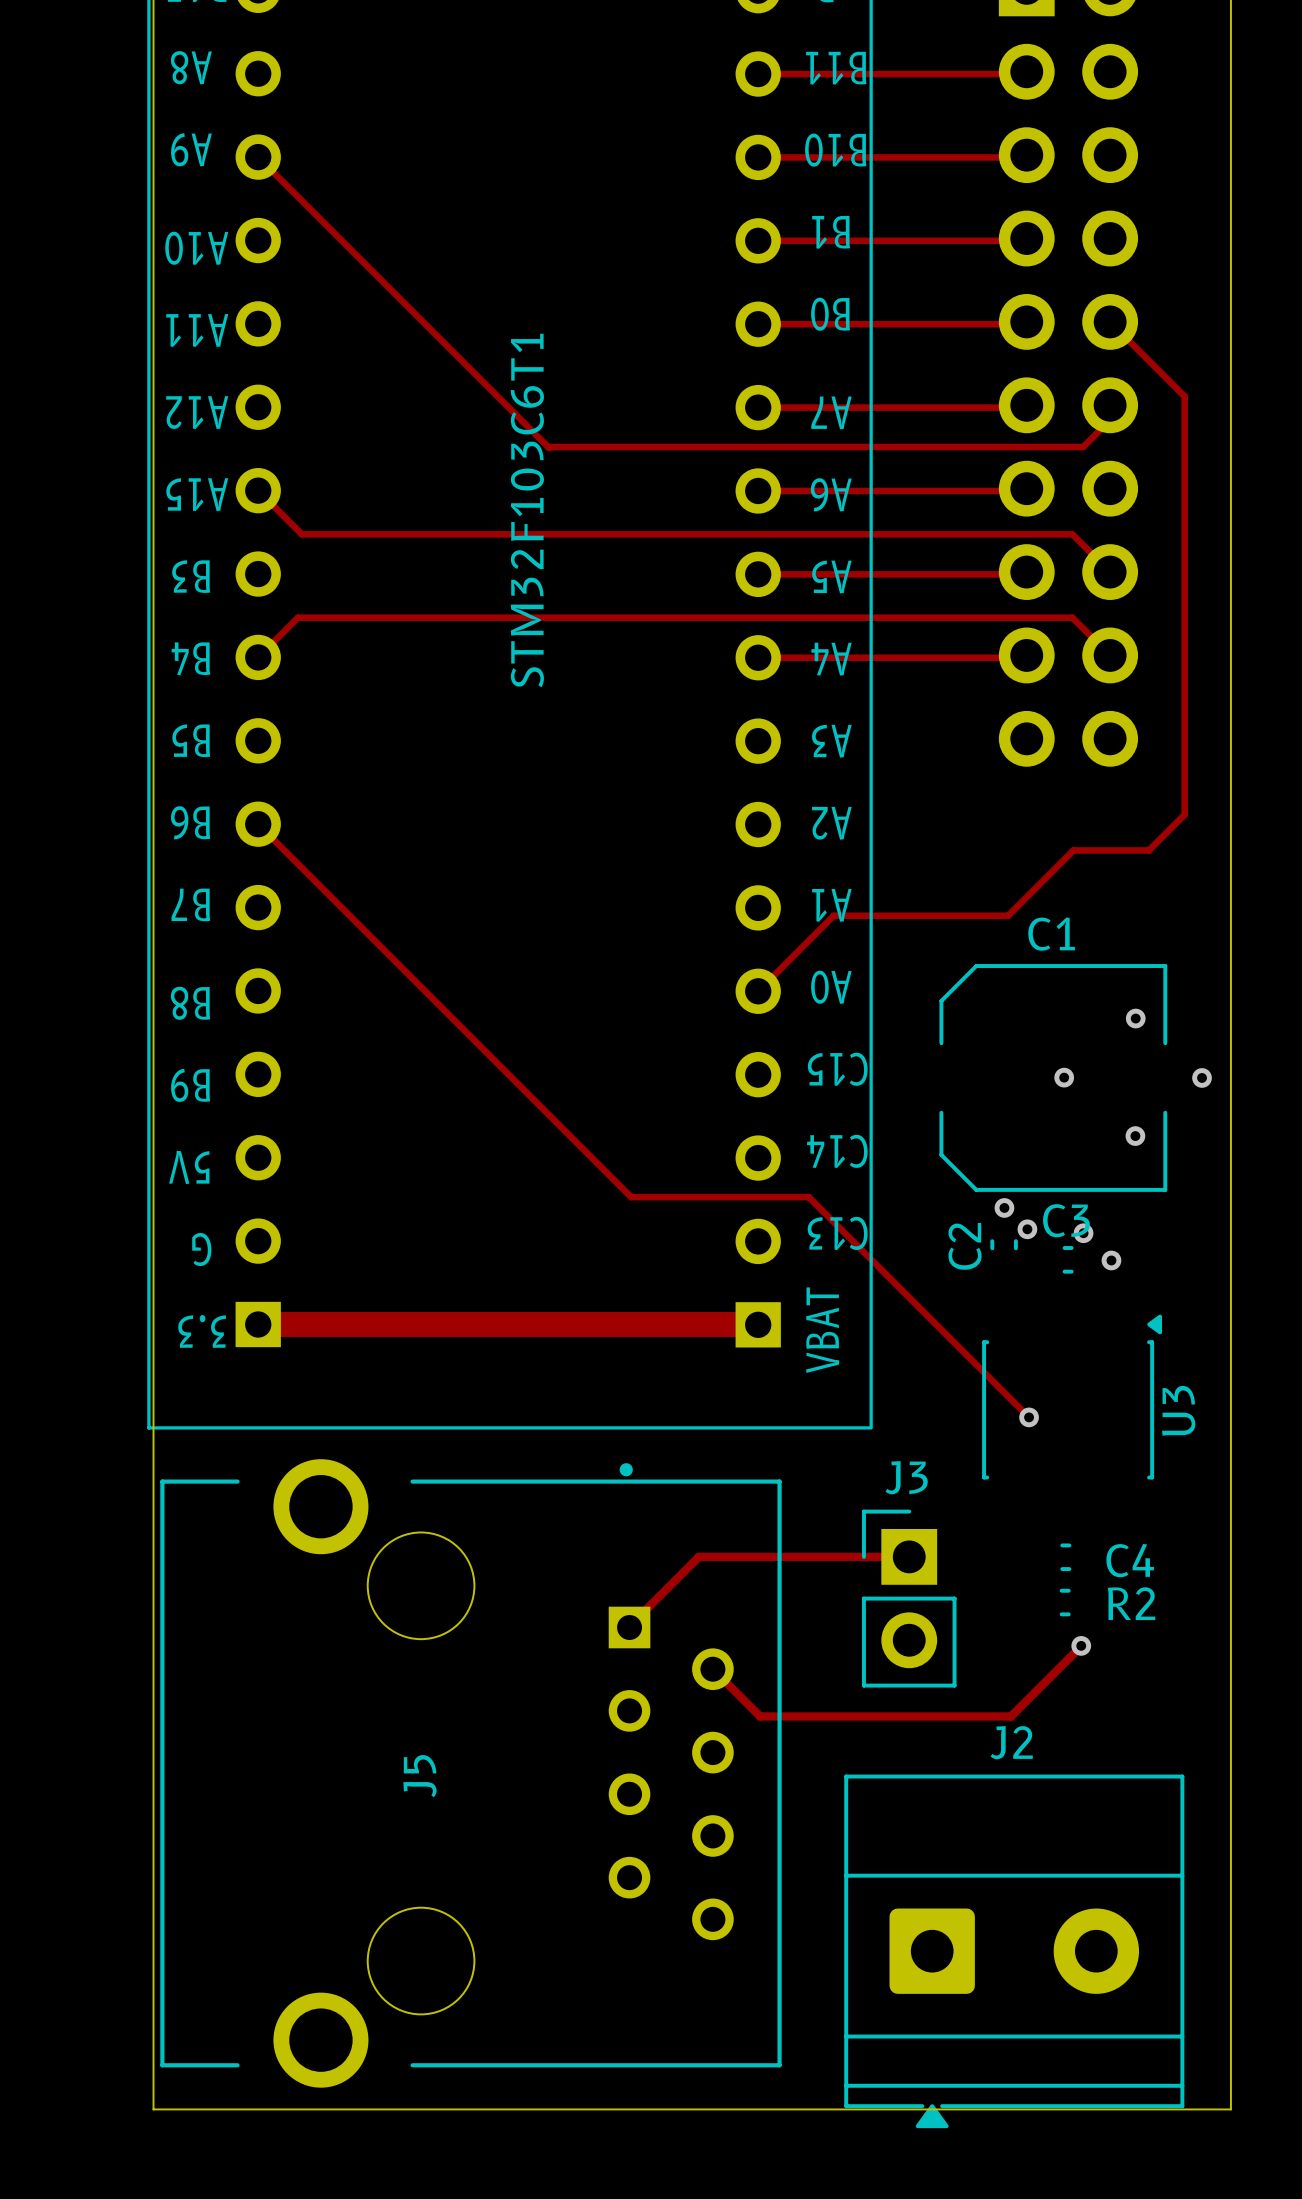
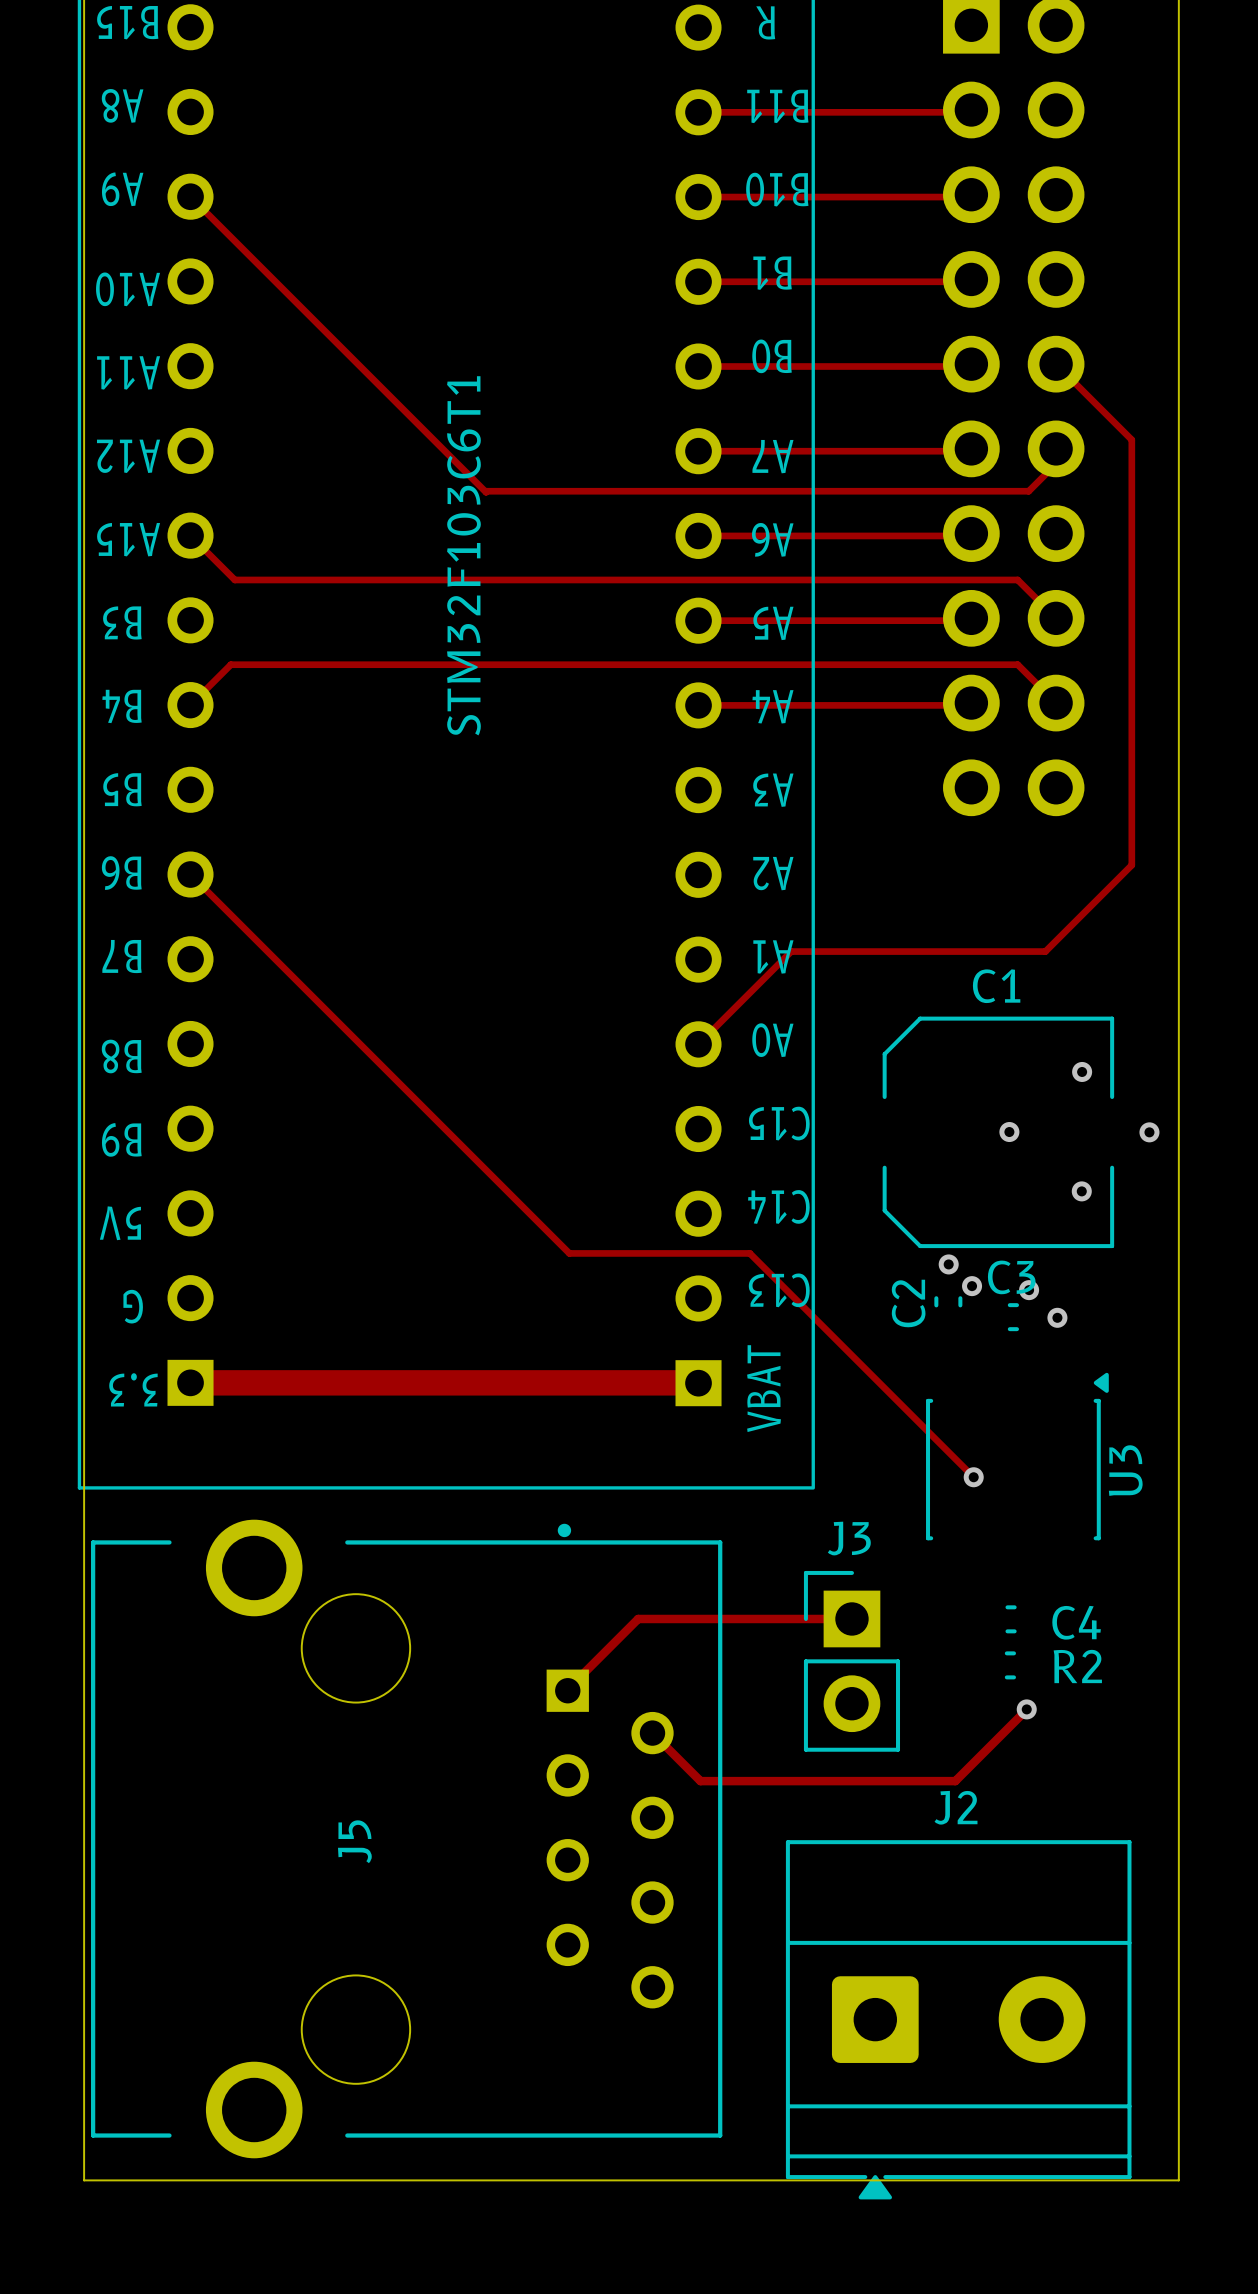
track: (1184, 814) (1148, 850) (1073, 850) (1008, 915) (833, 915) -> (1131, 865) (1045, 951) (791, 951) (775, 967)

